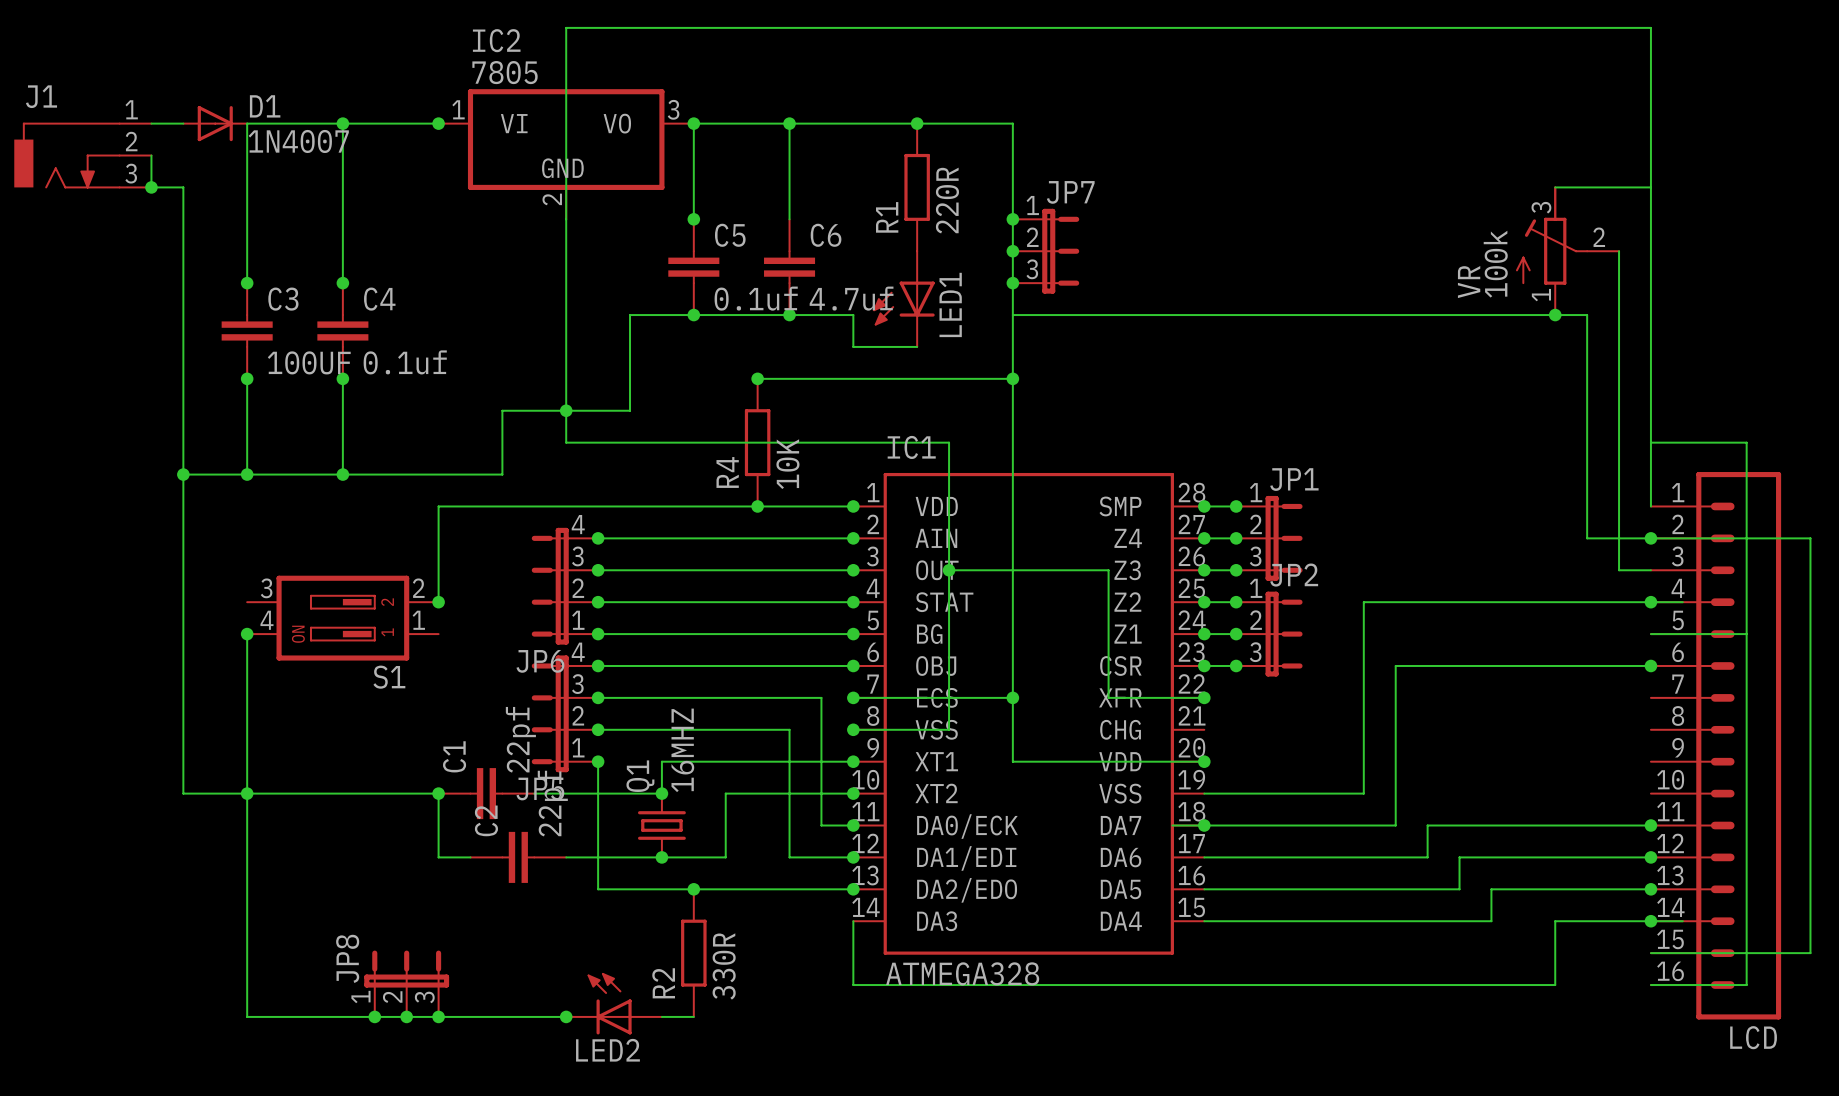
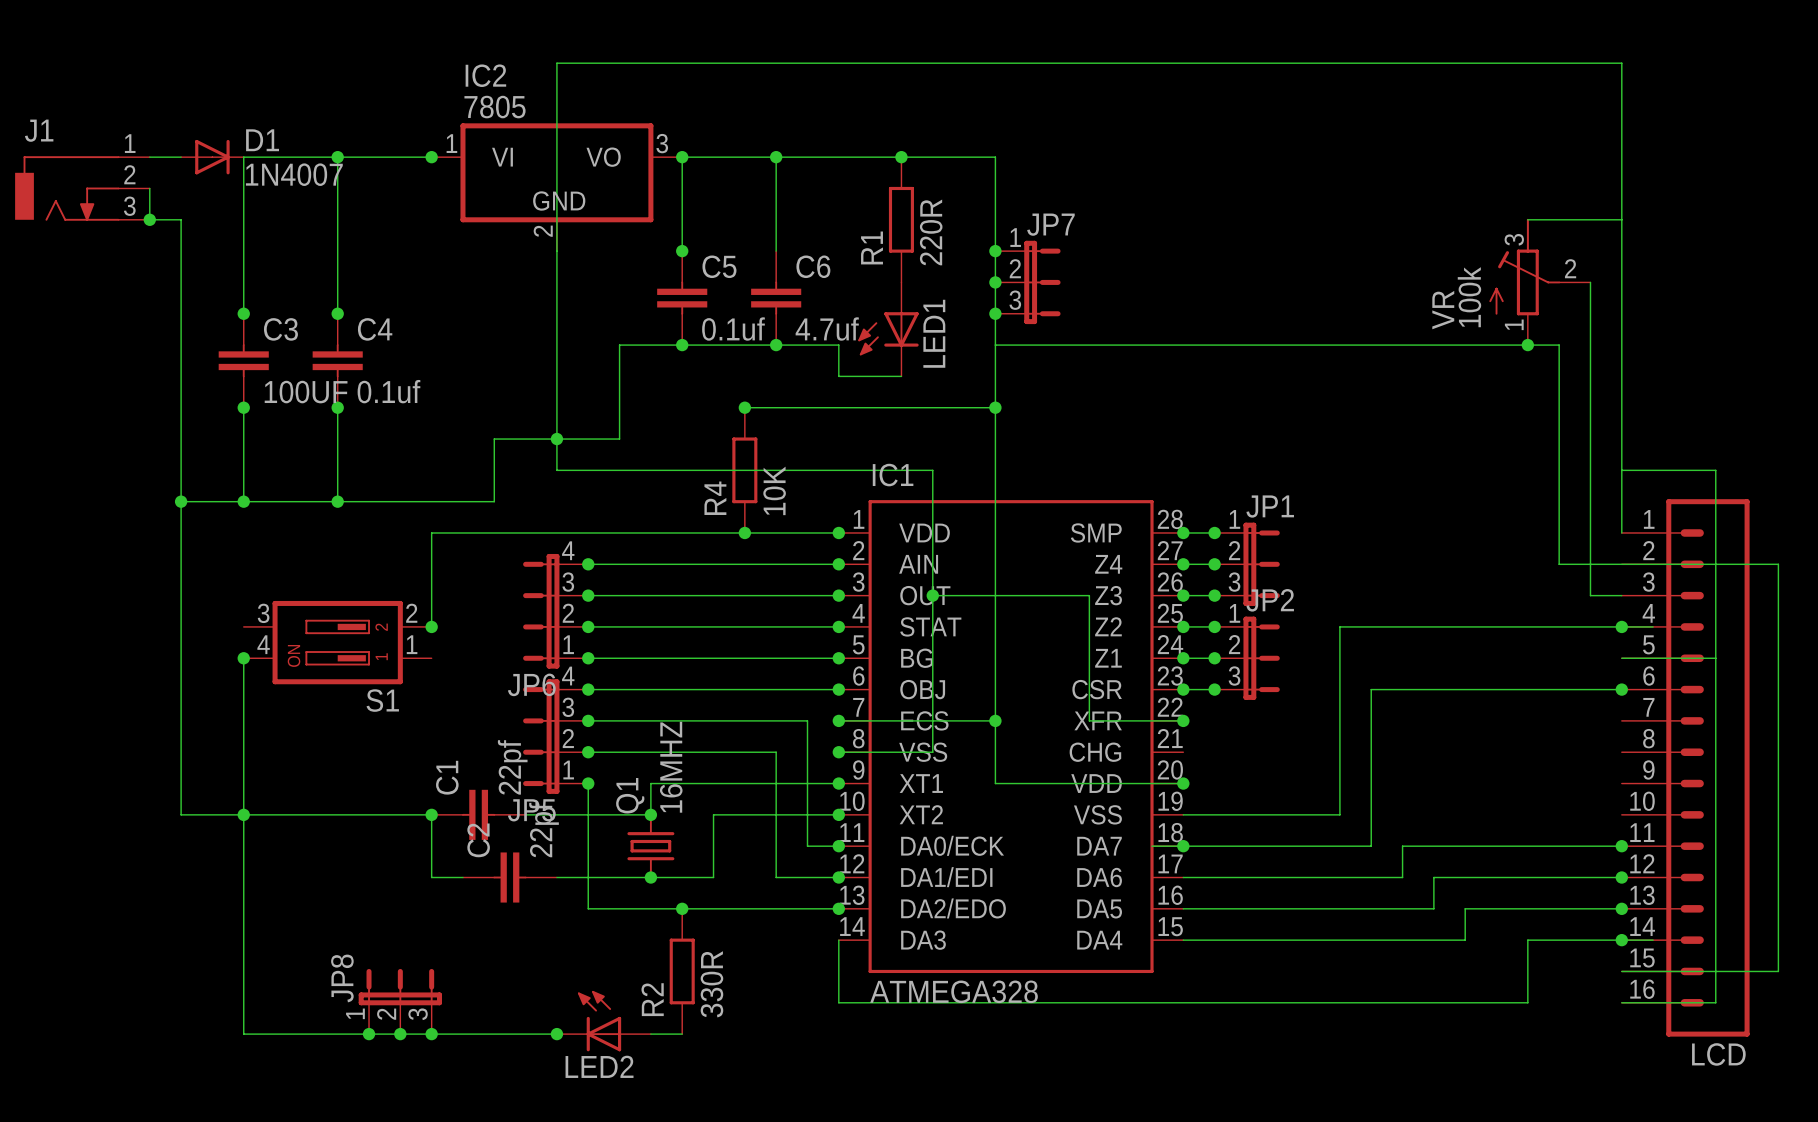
junction: (1650, 538) -> none

